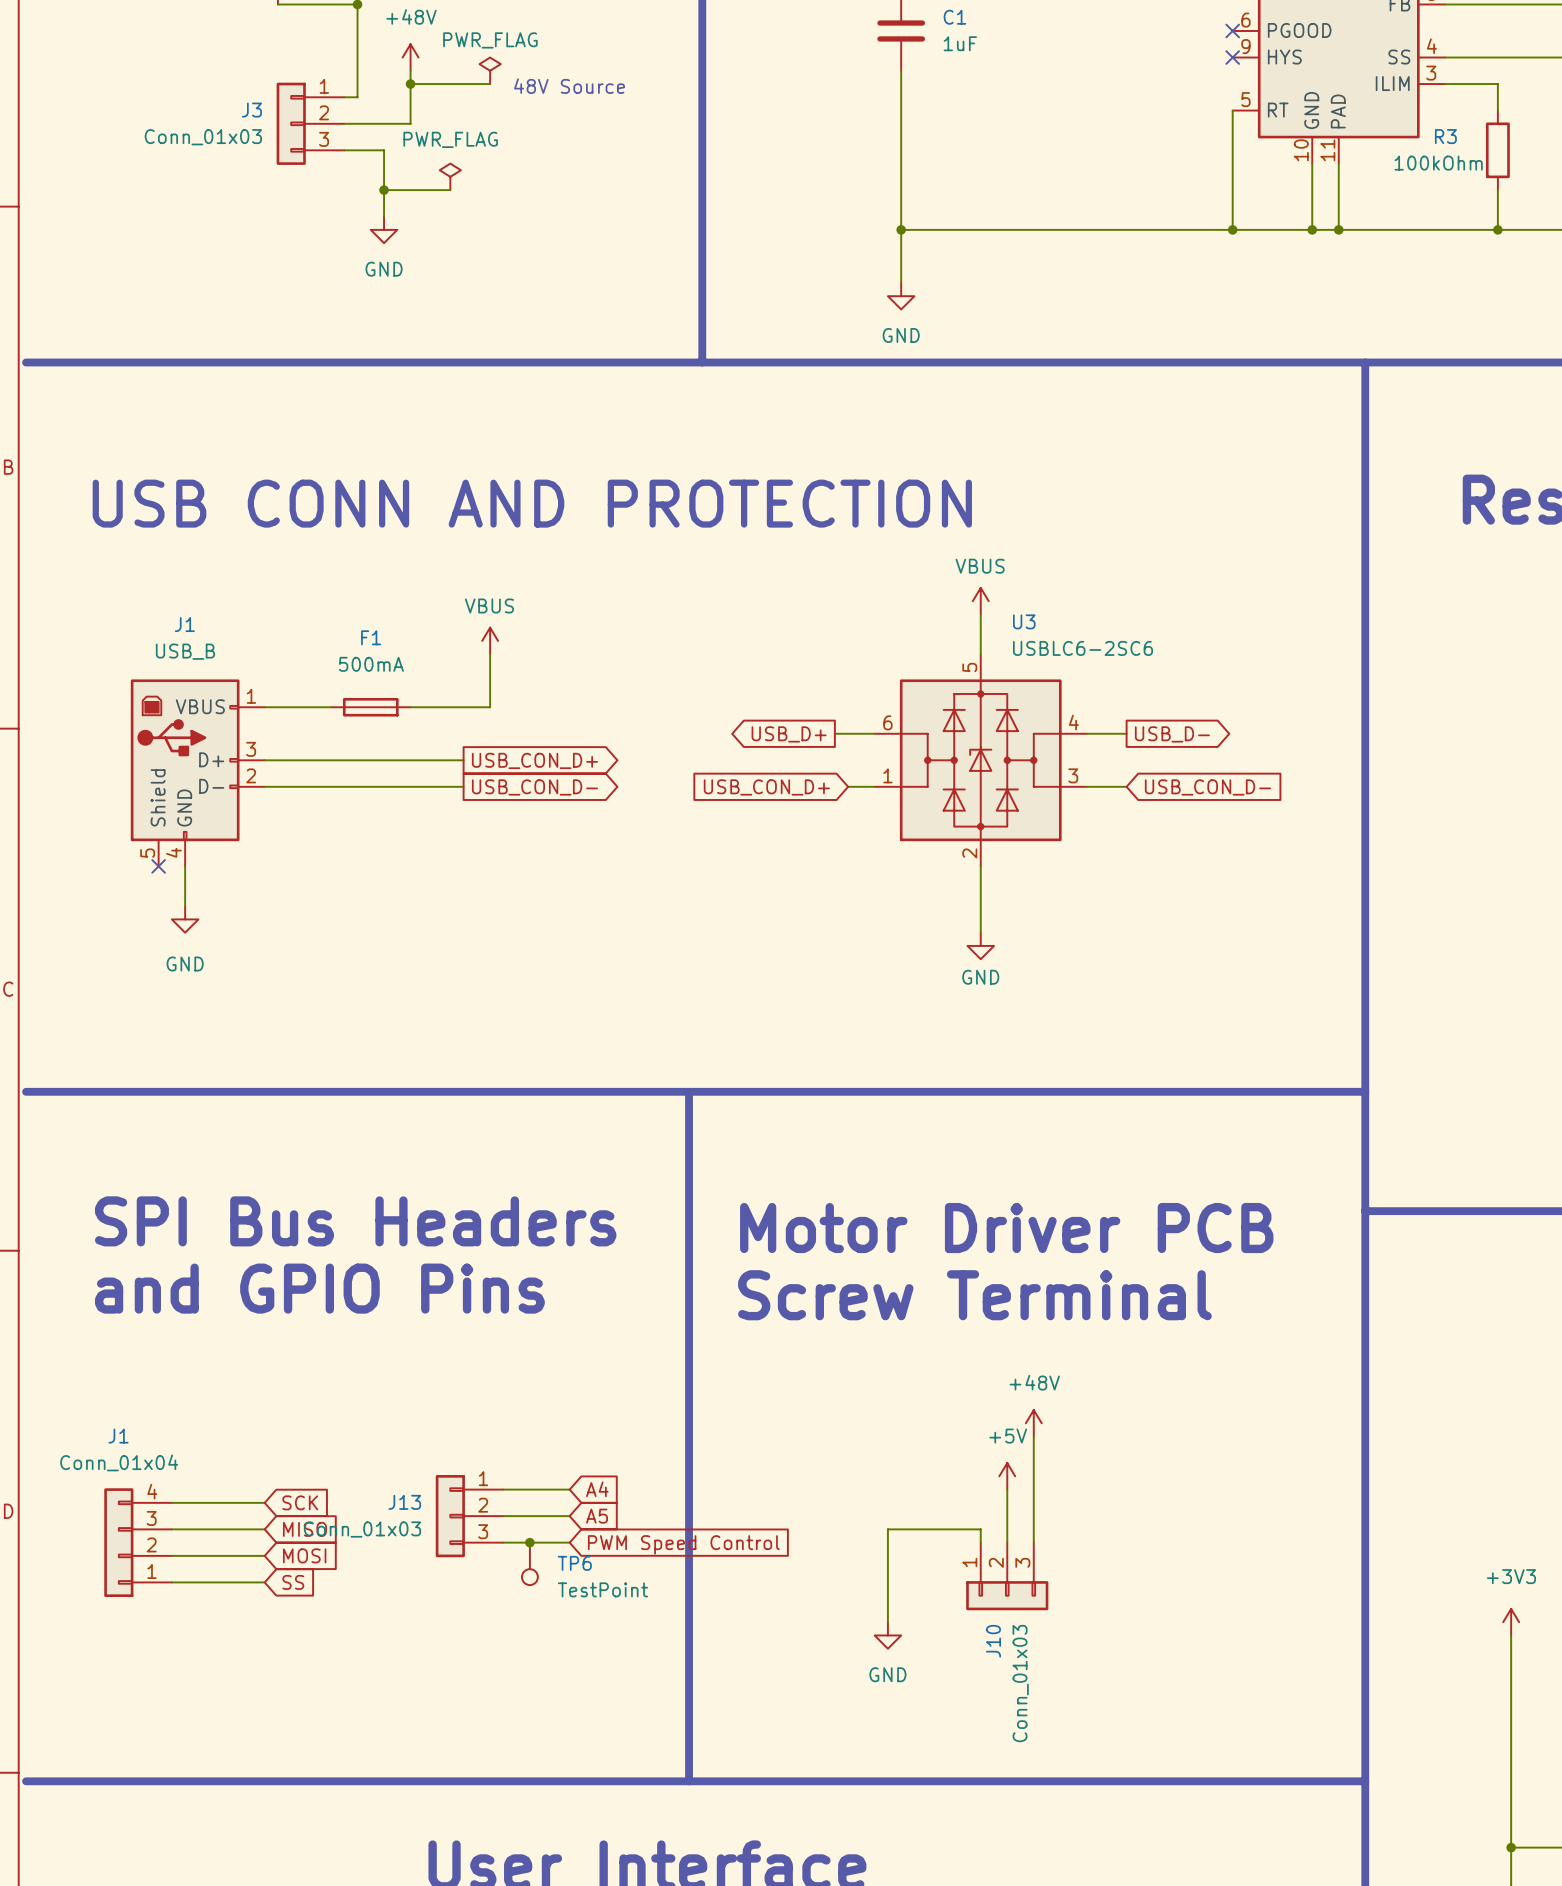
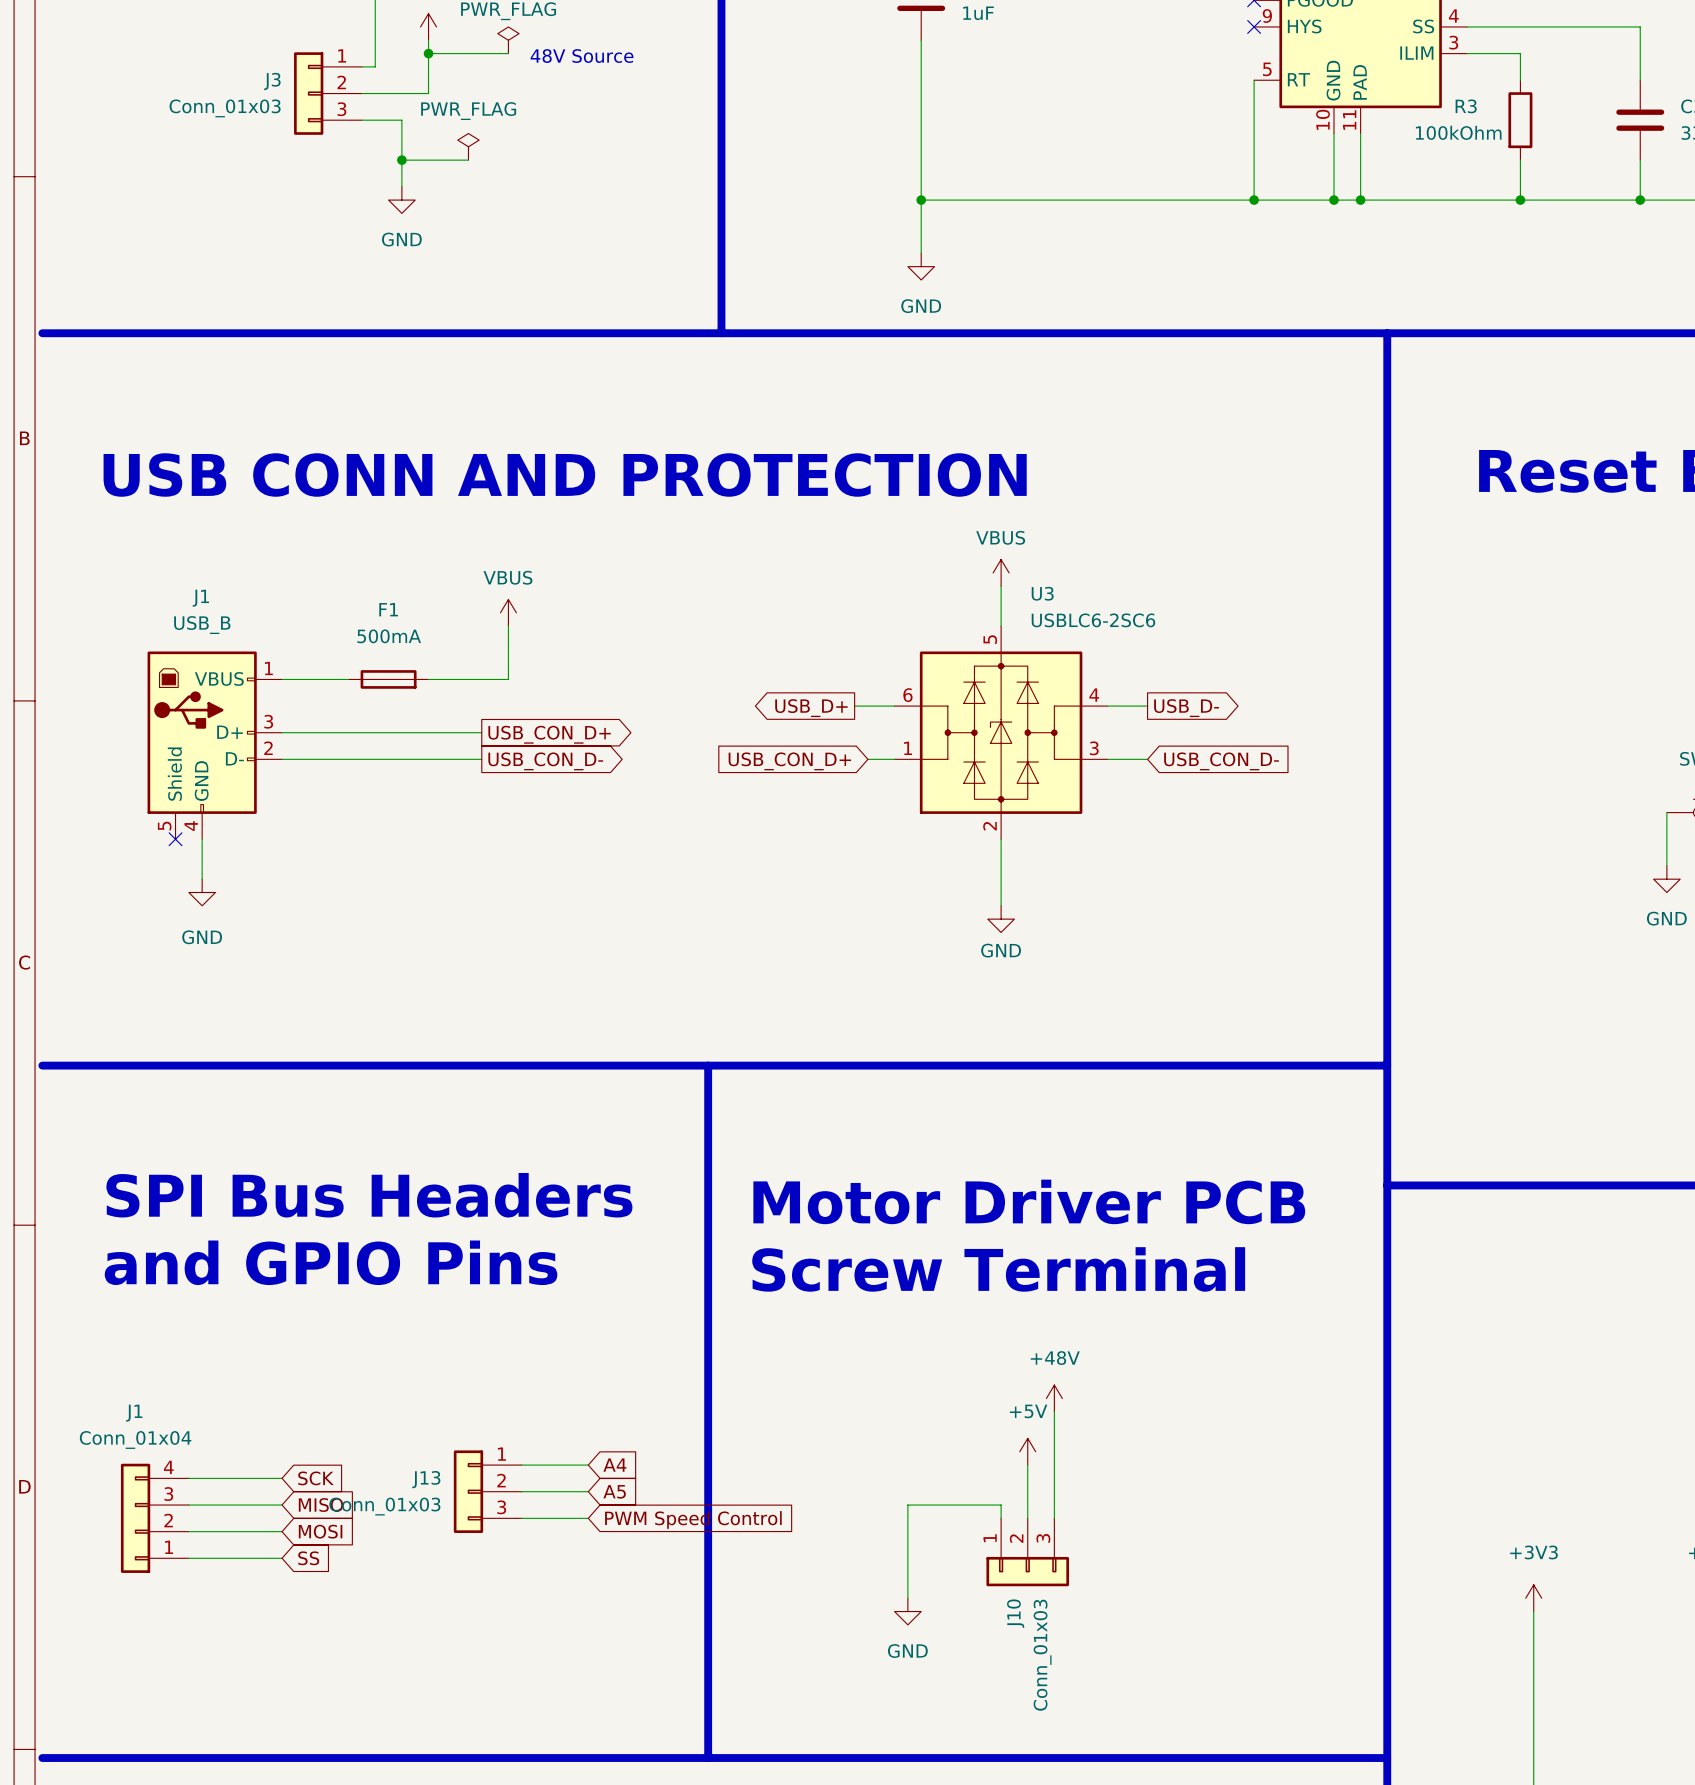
junction: (529, 1542) -> none
TP6: TestPoint (529, 1563) -> none

